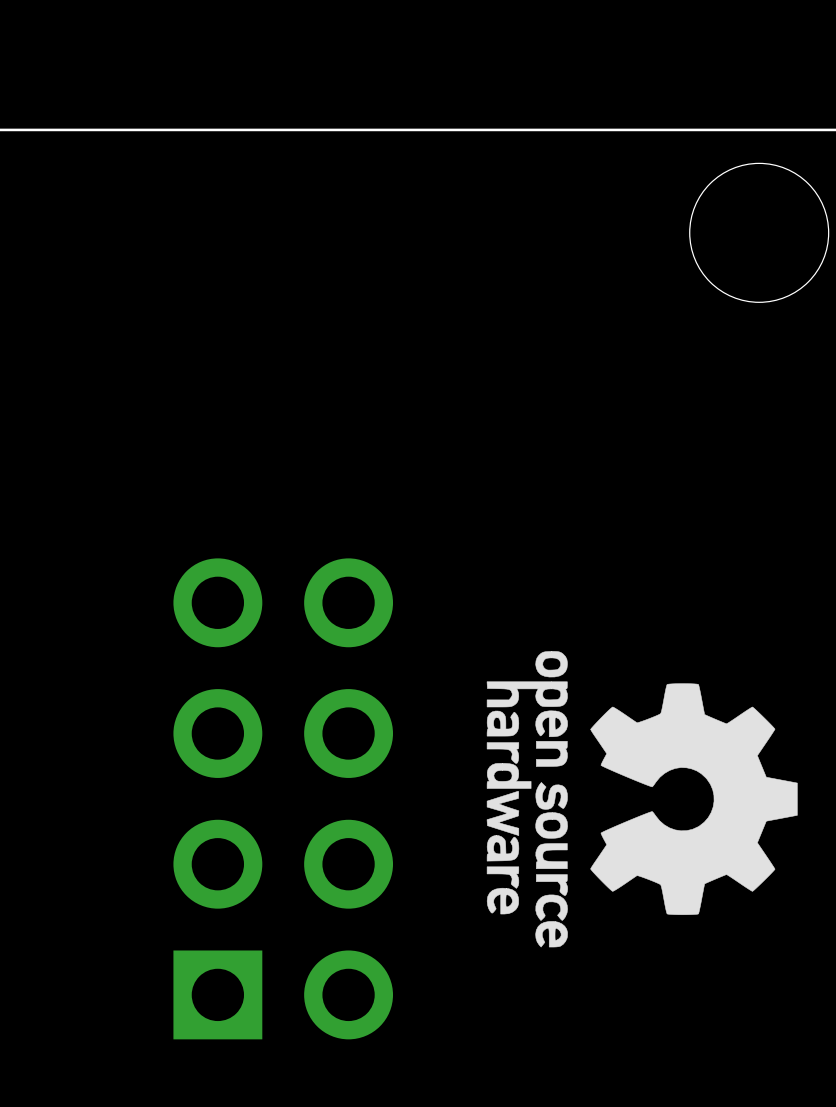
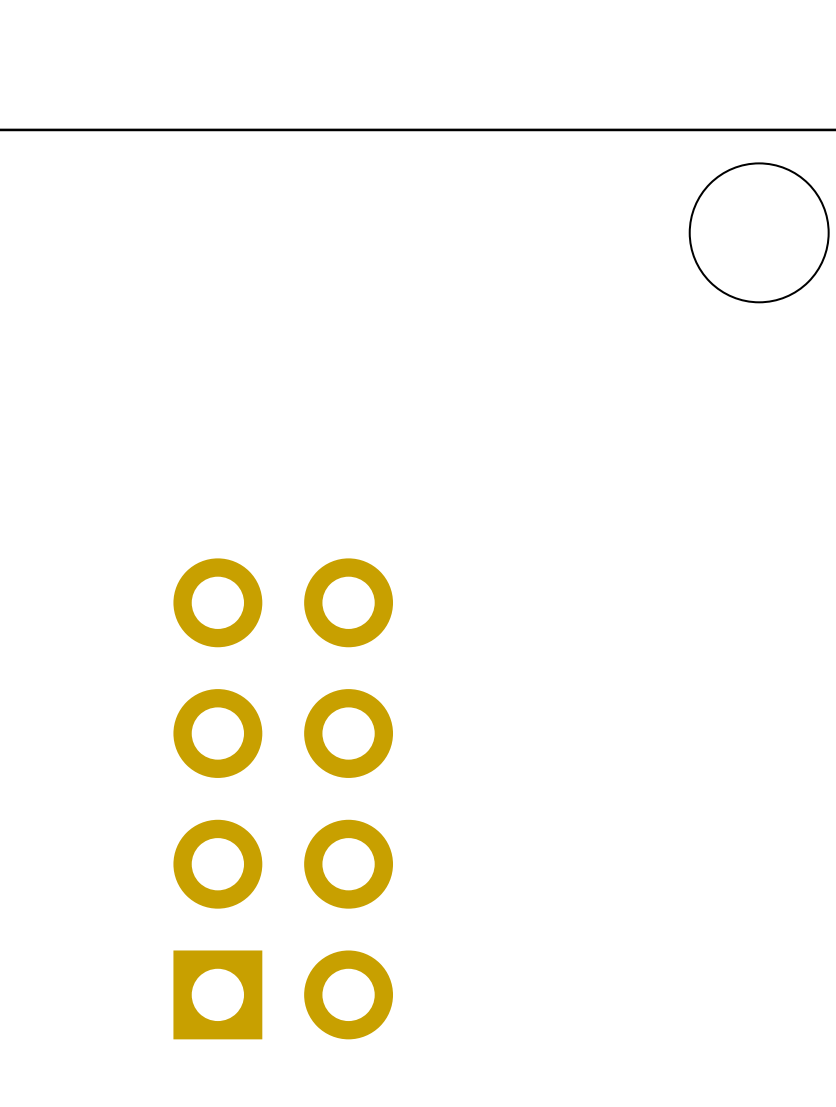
drawing: [486, 651, 798, 948] -> none

